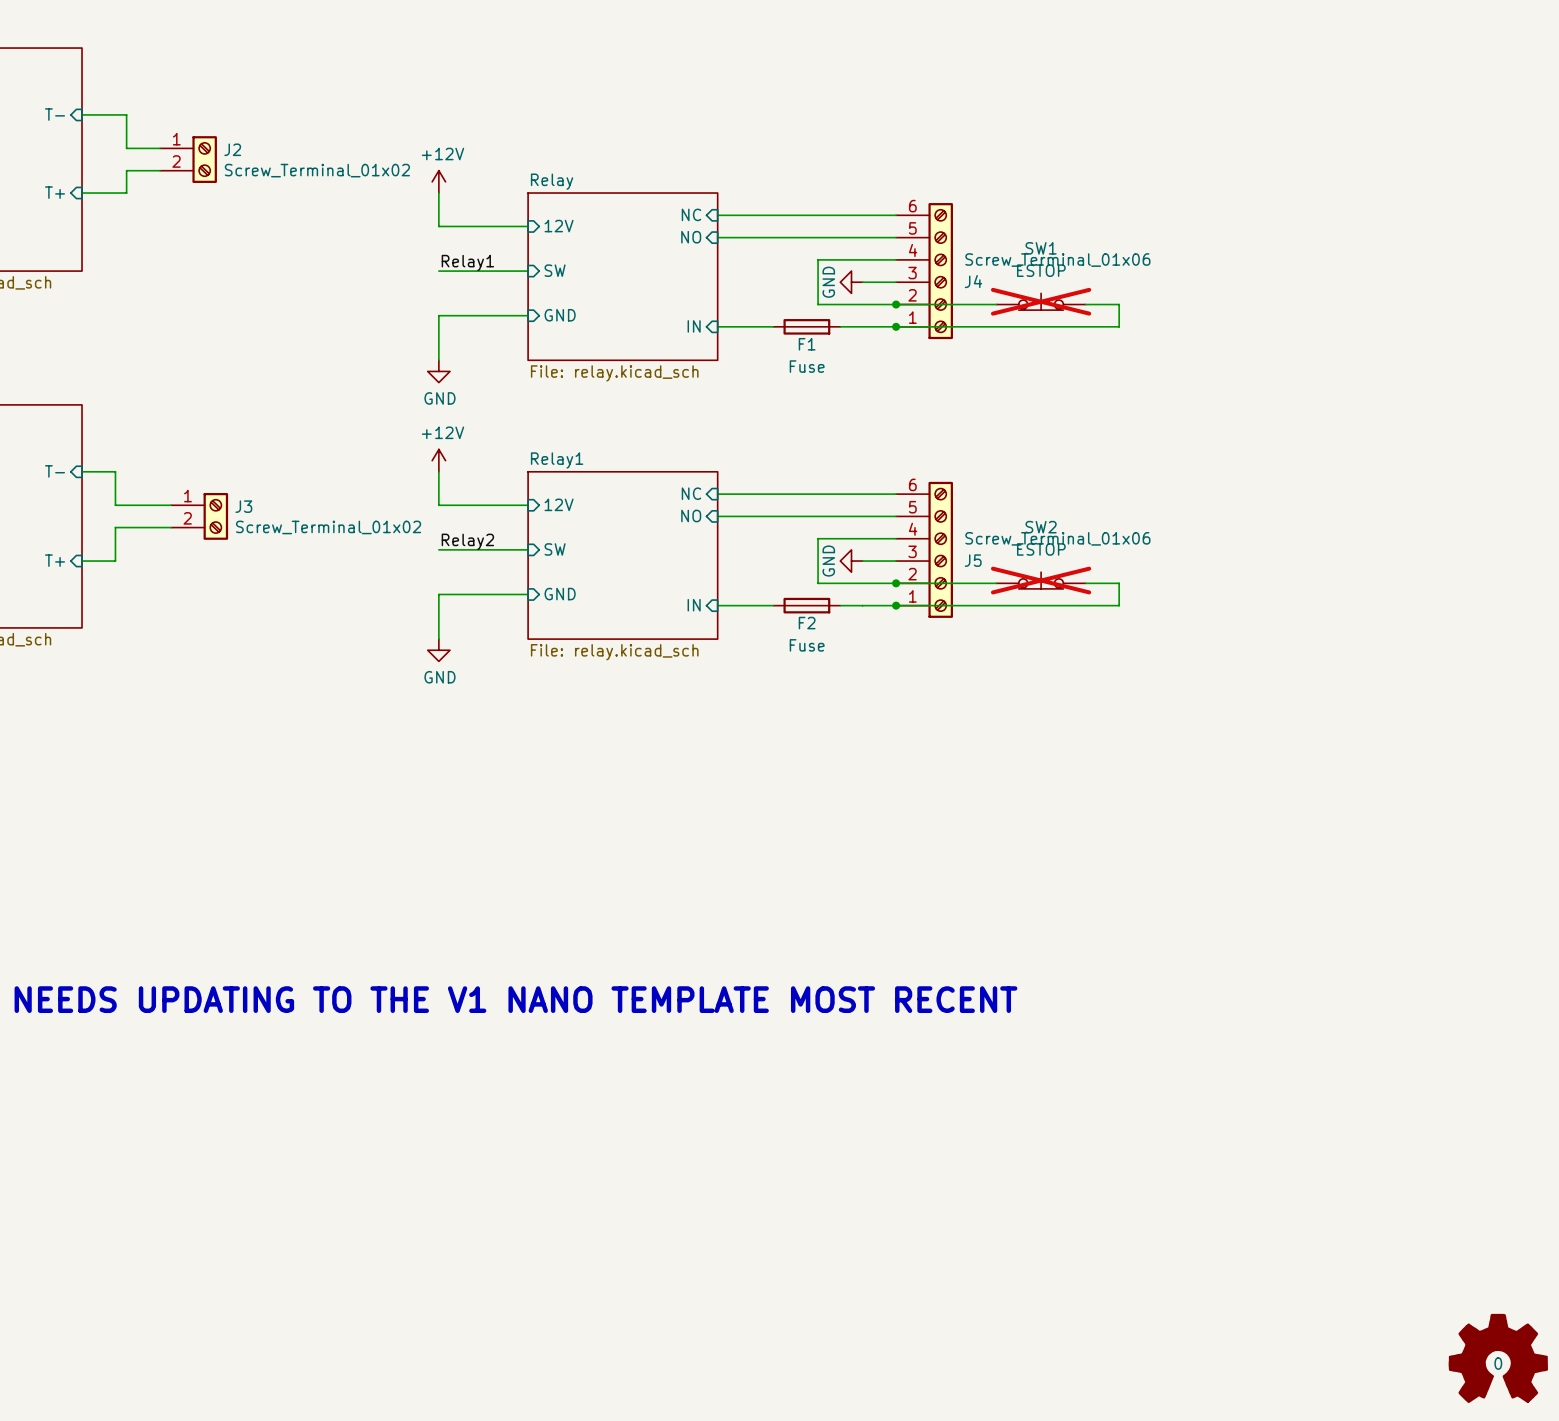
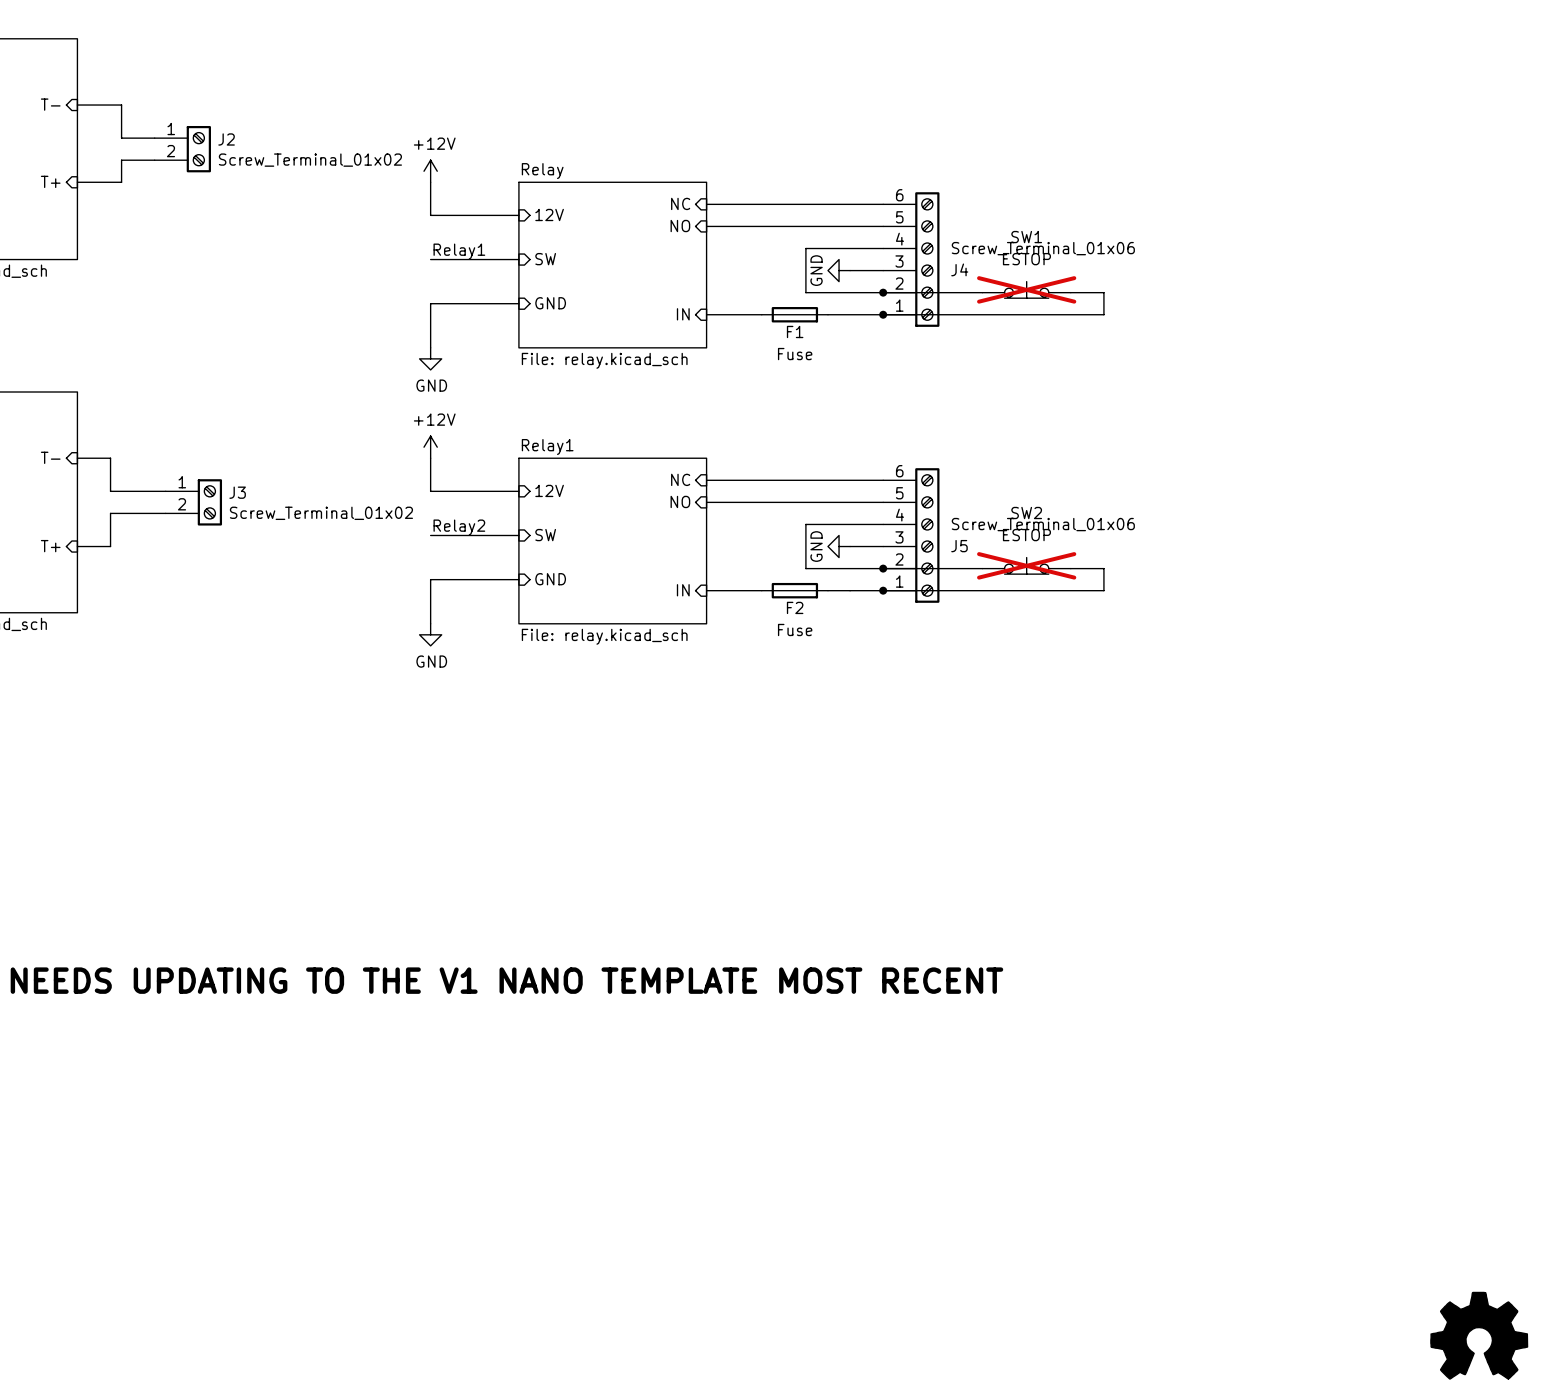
power symbol text: 0 (1498, 1363) -> none

